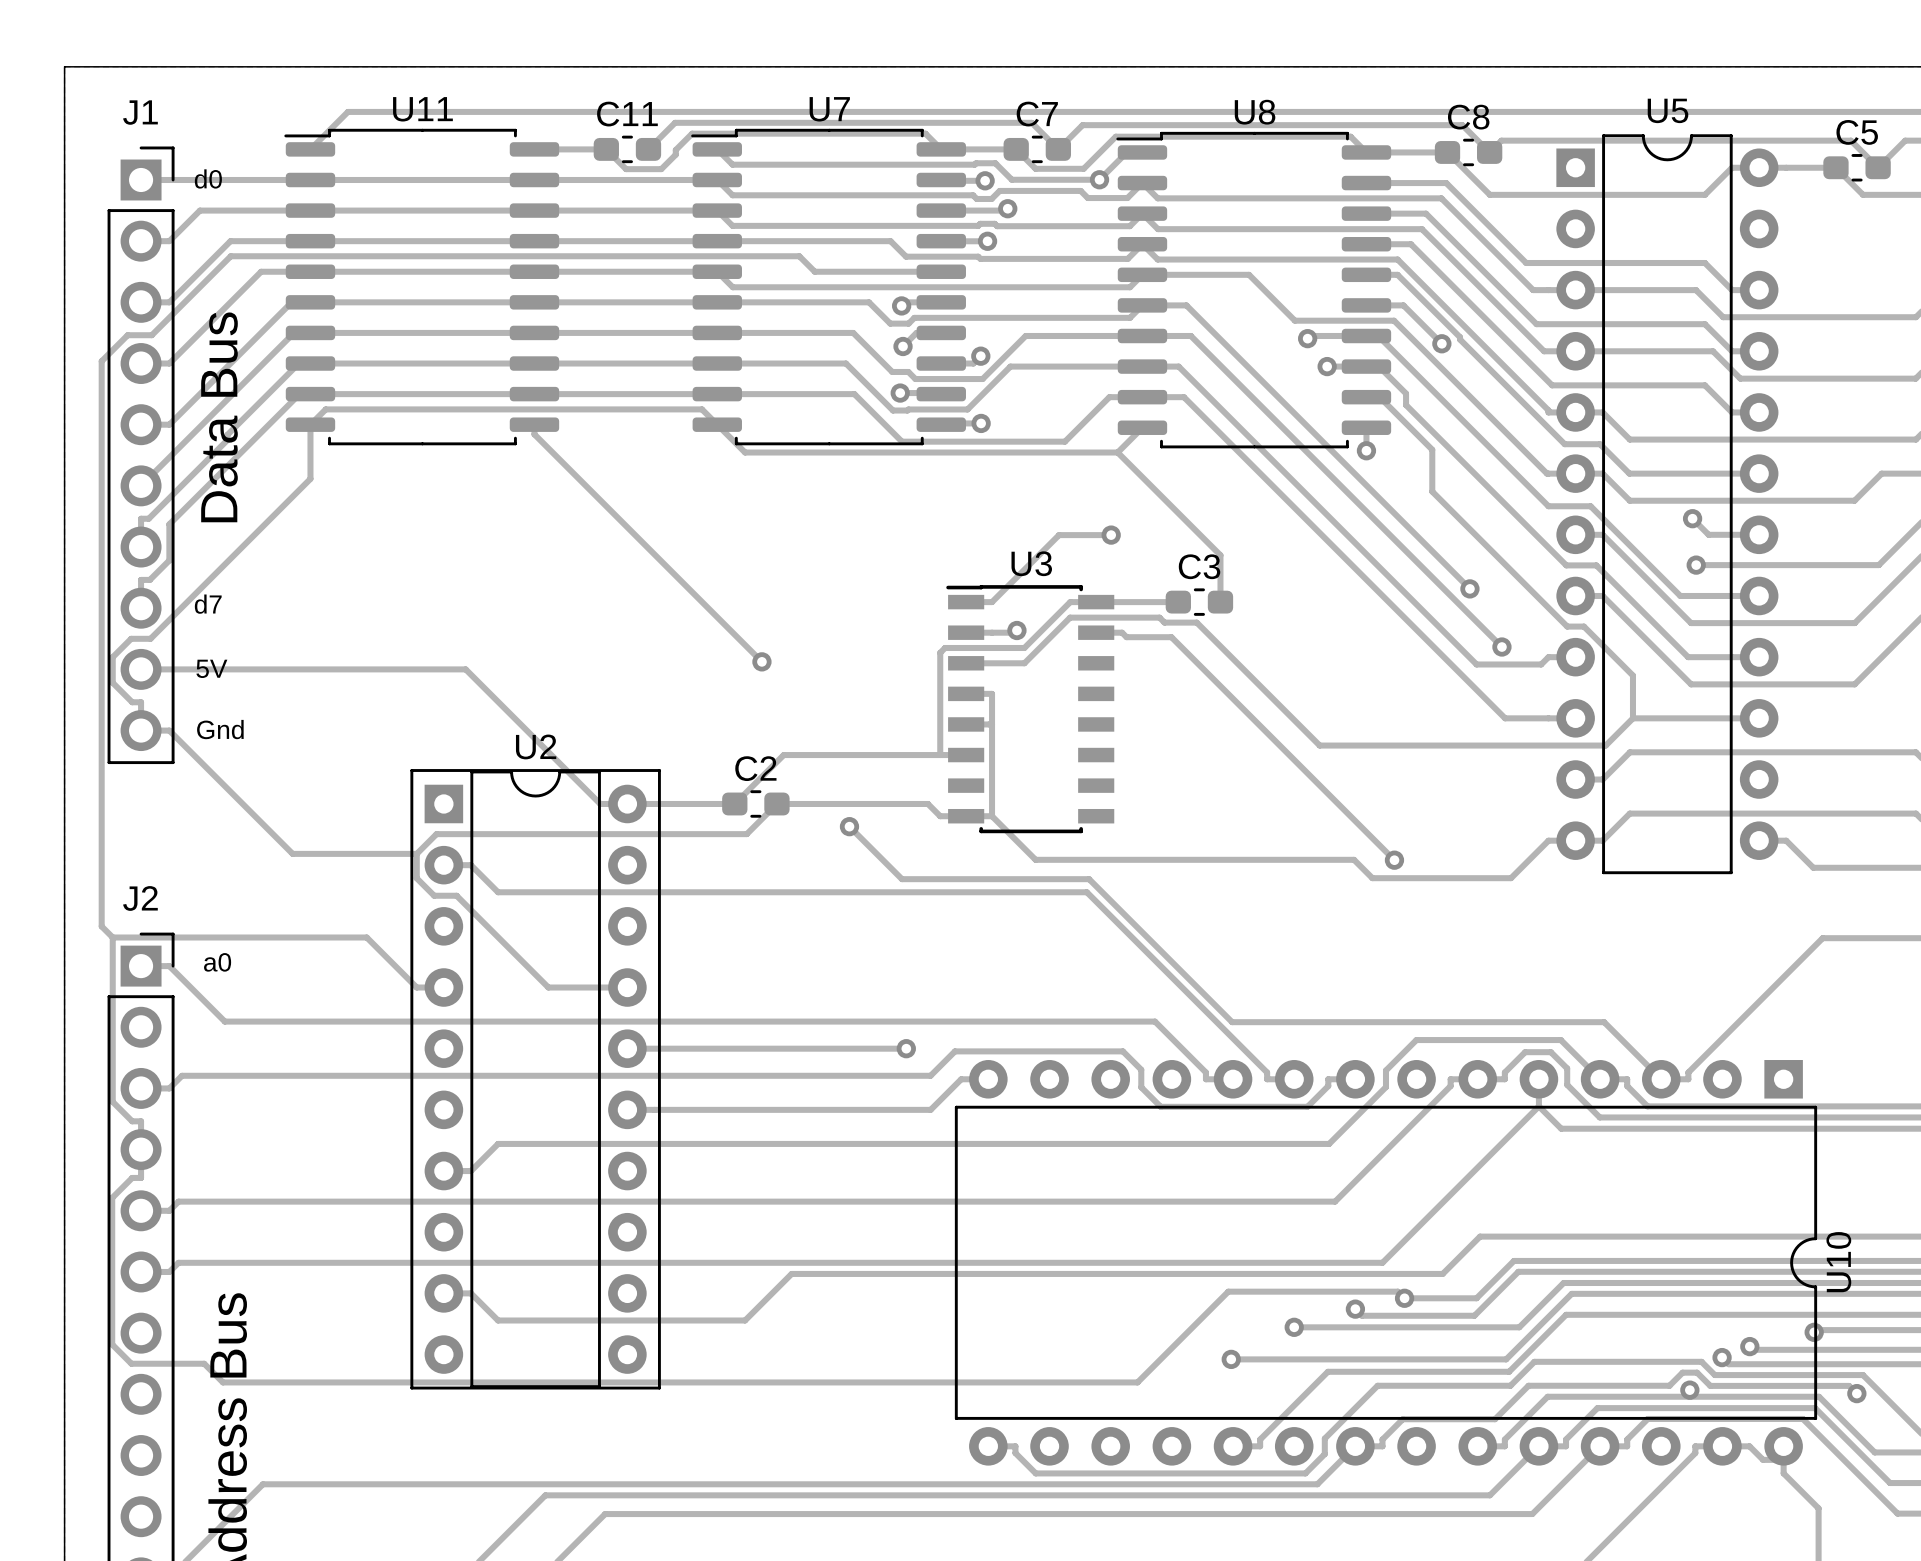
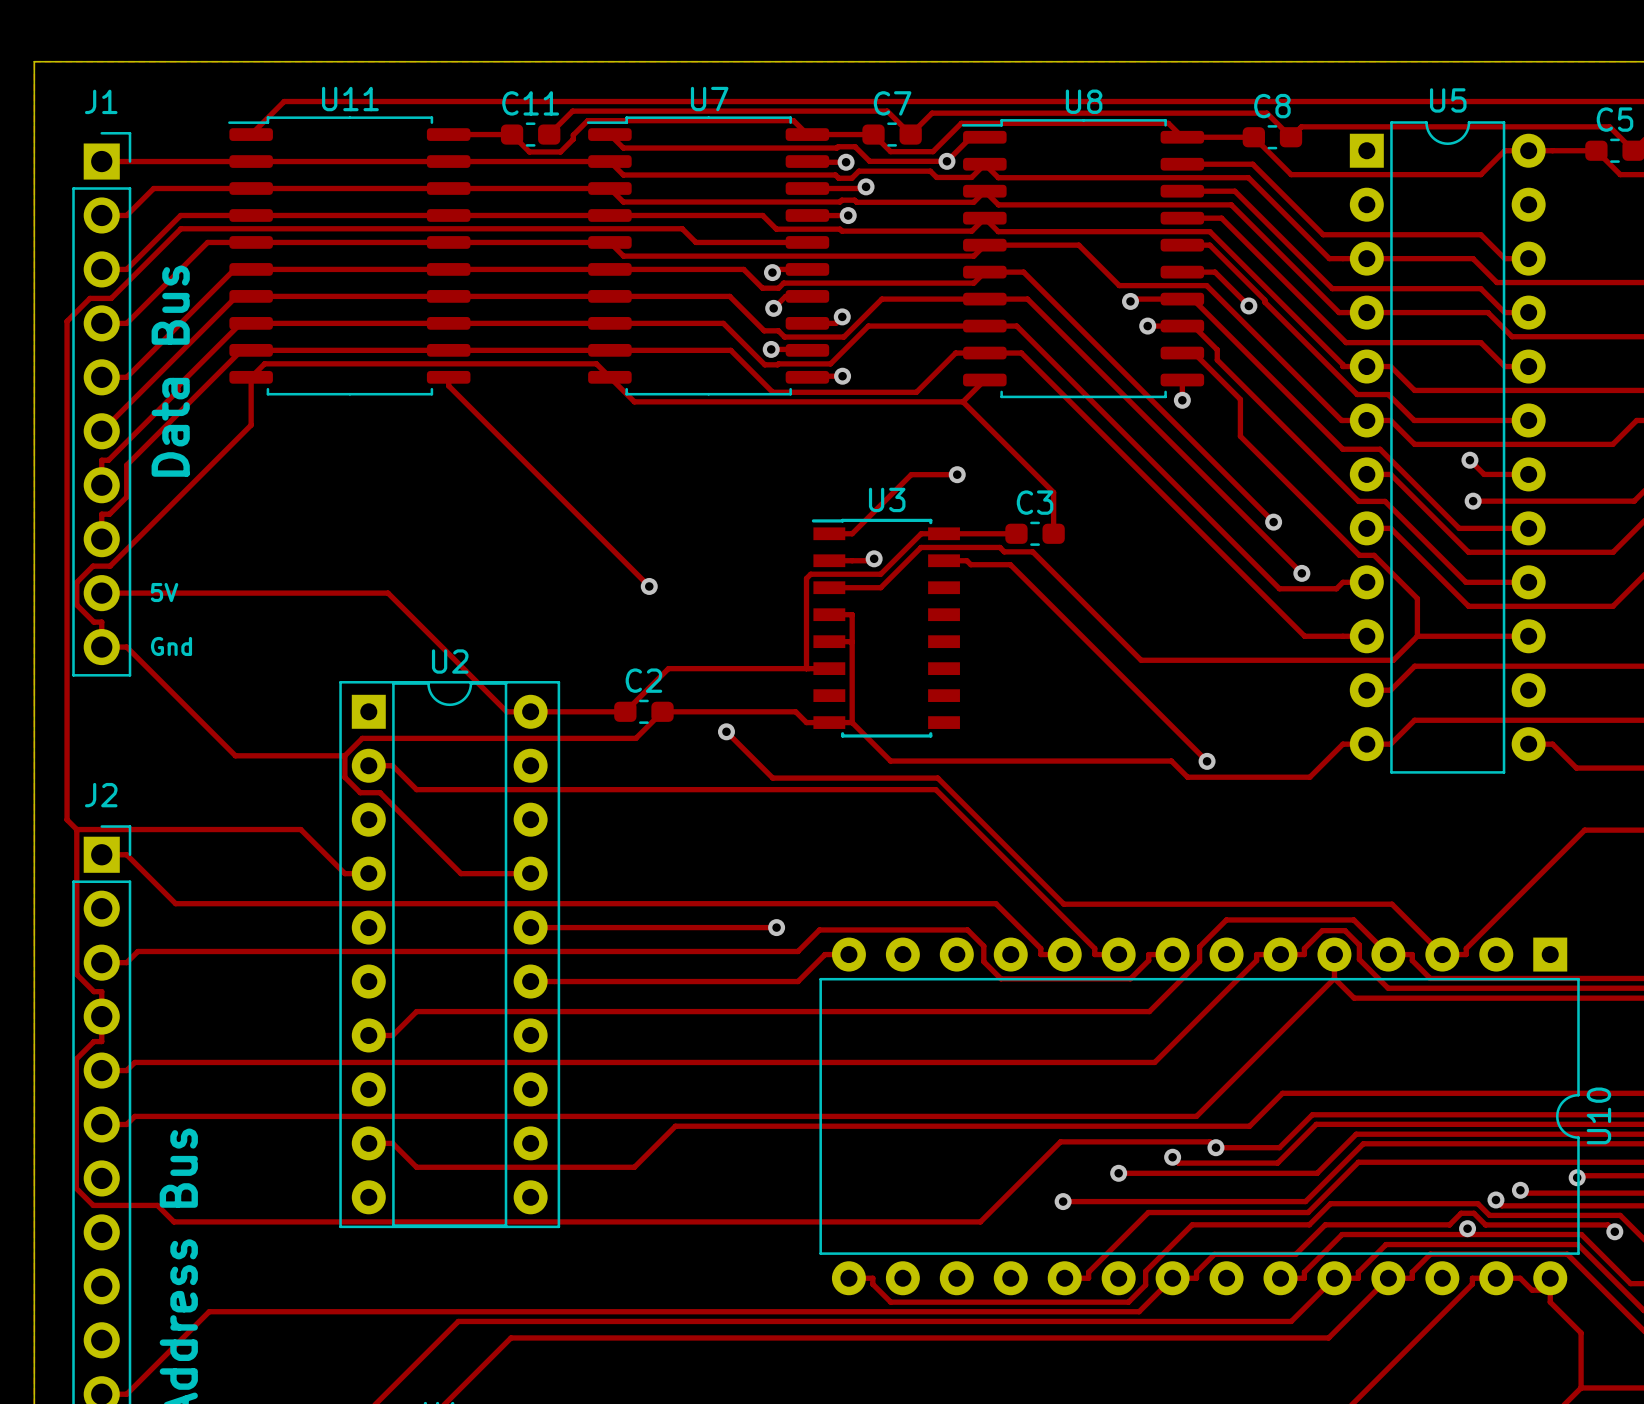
text: d0 (208, 178) -> none
text: d7 (208, 604) -> none
text: a0 (217, 962) -> none

